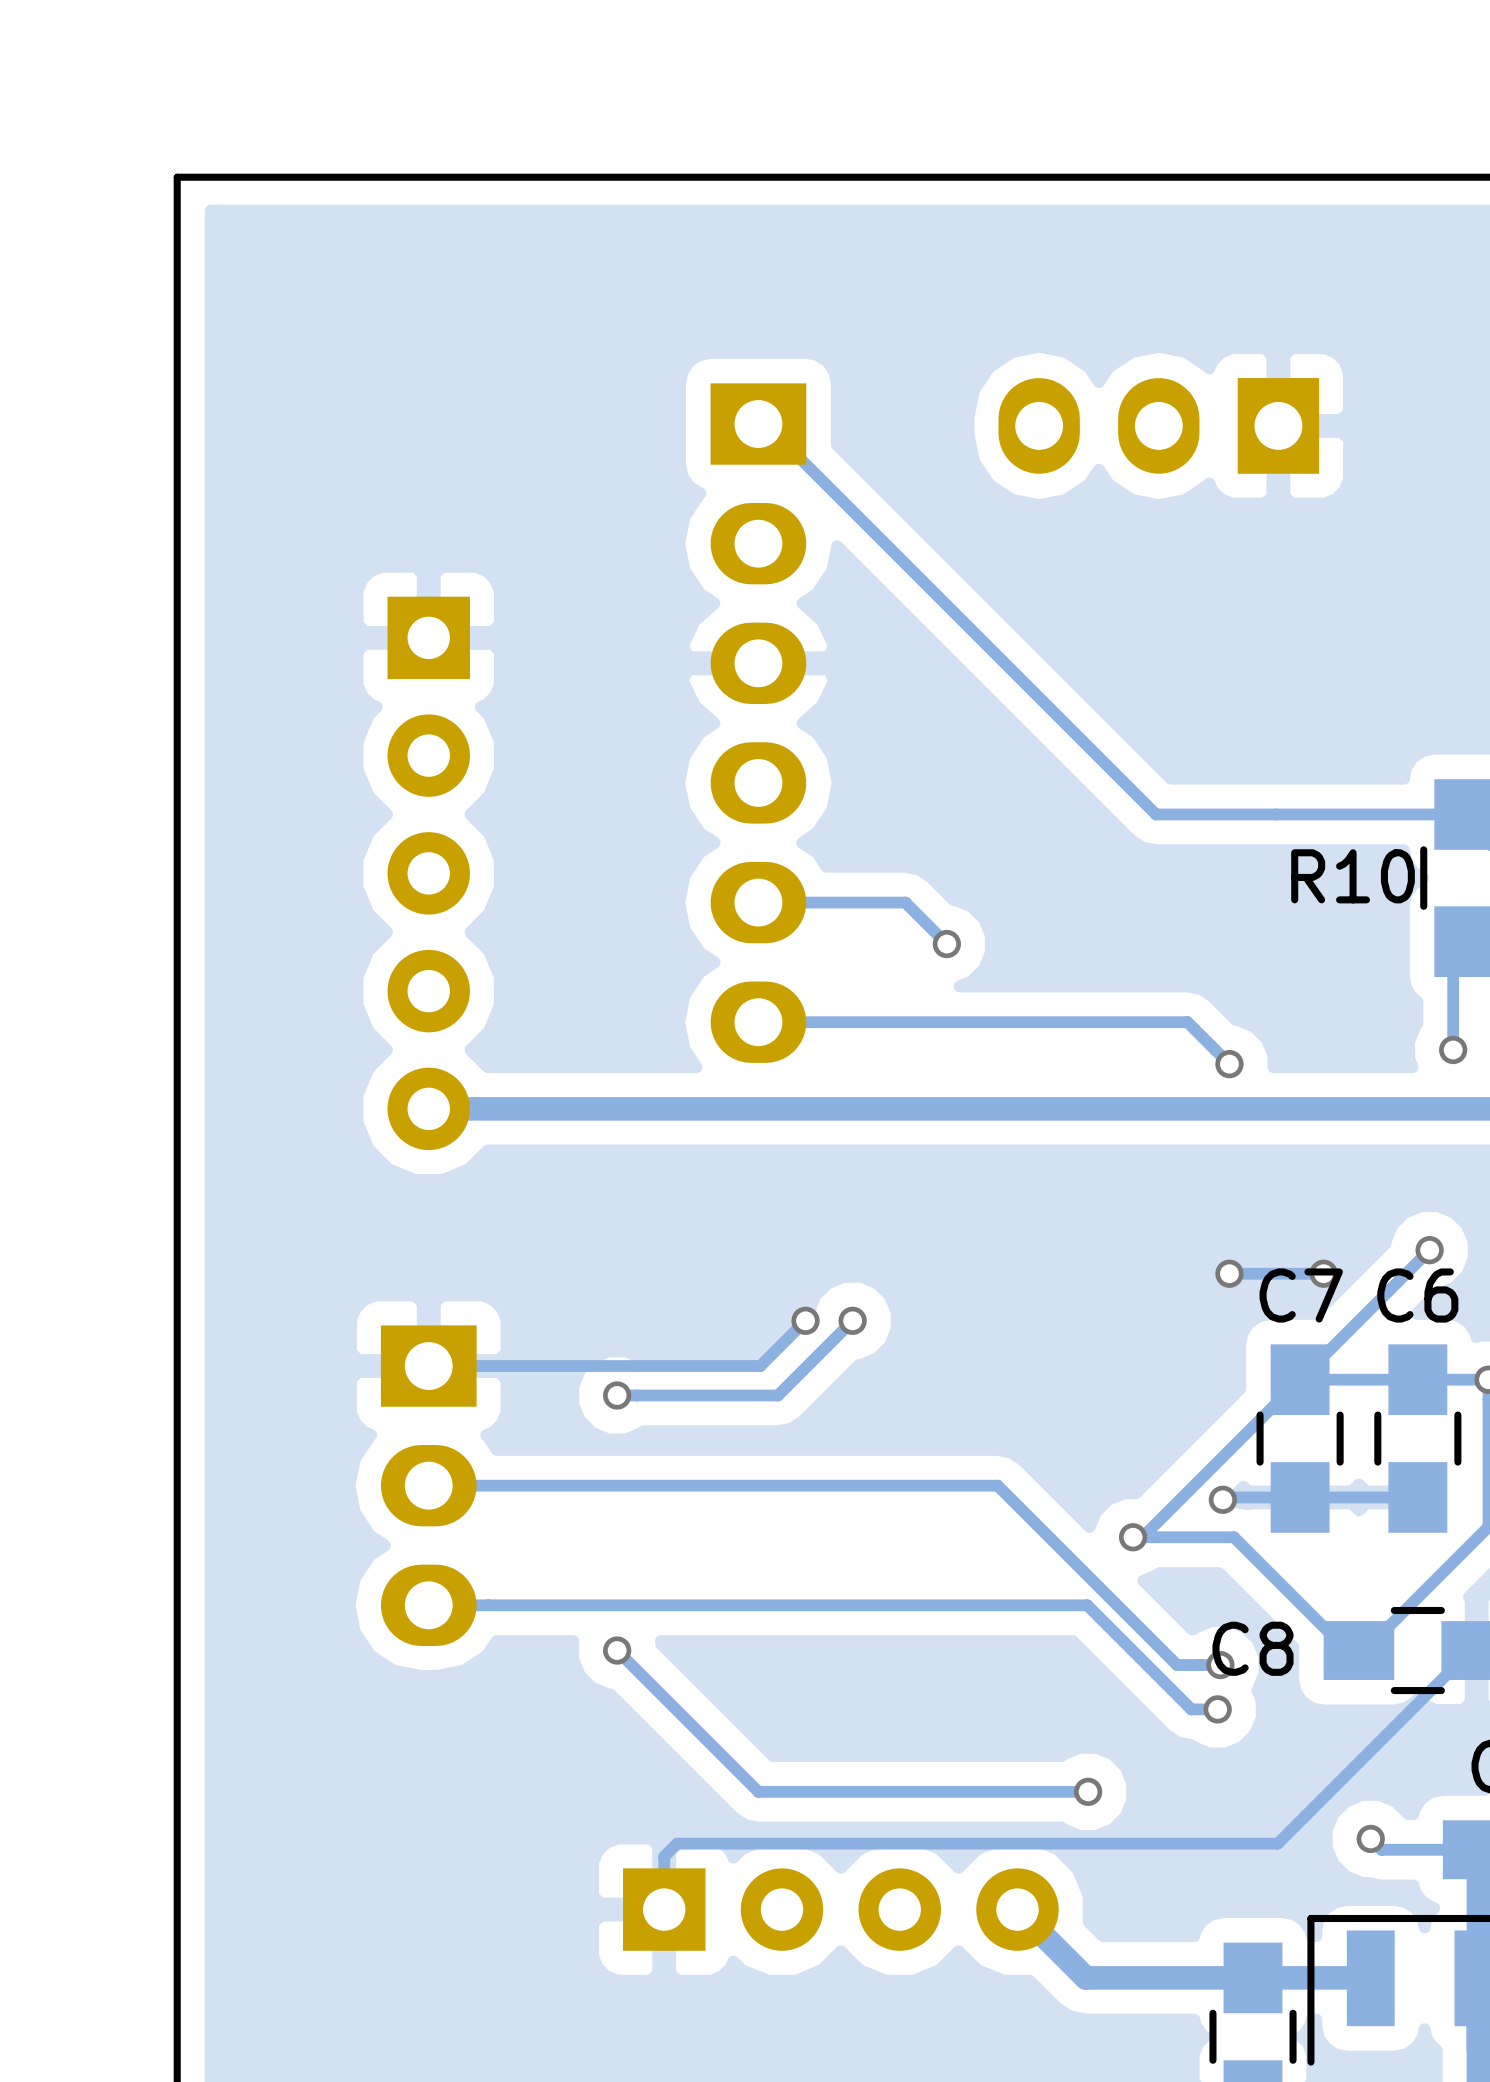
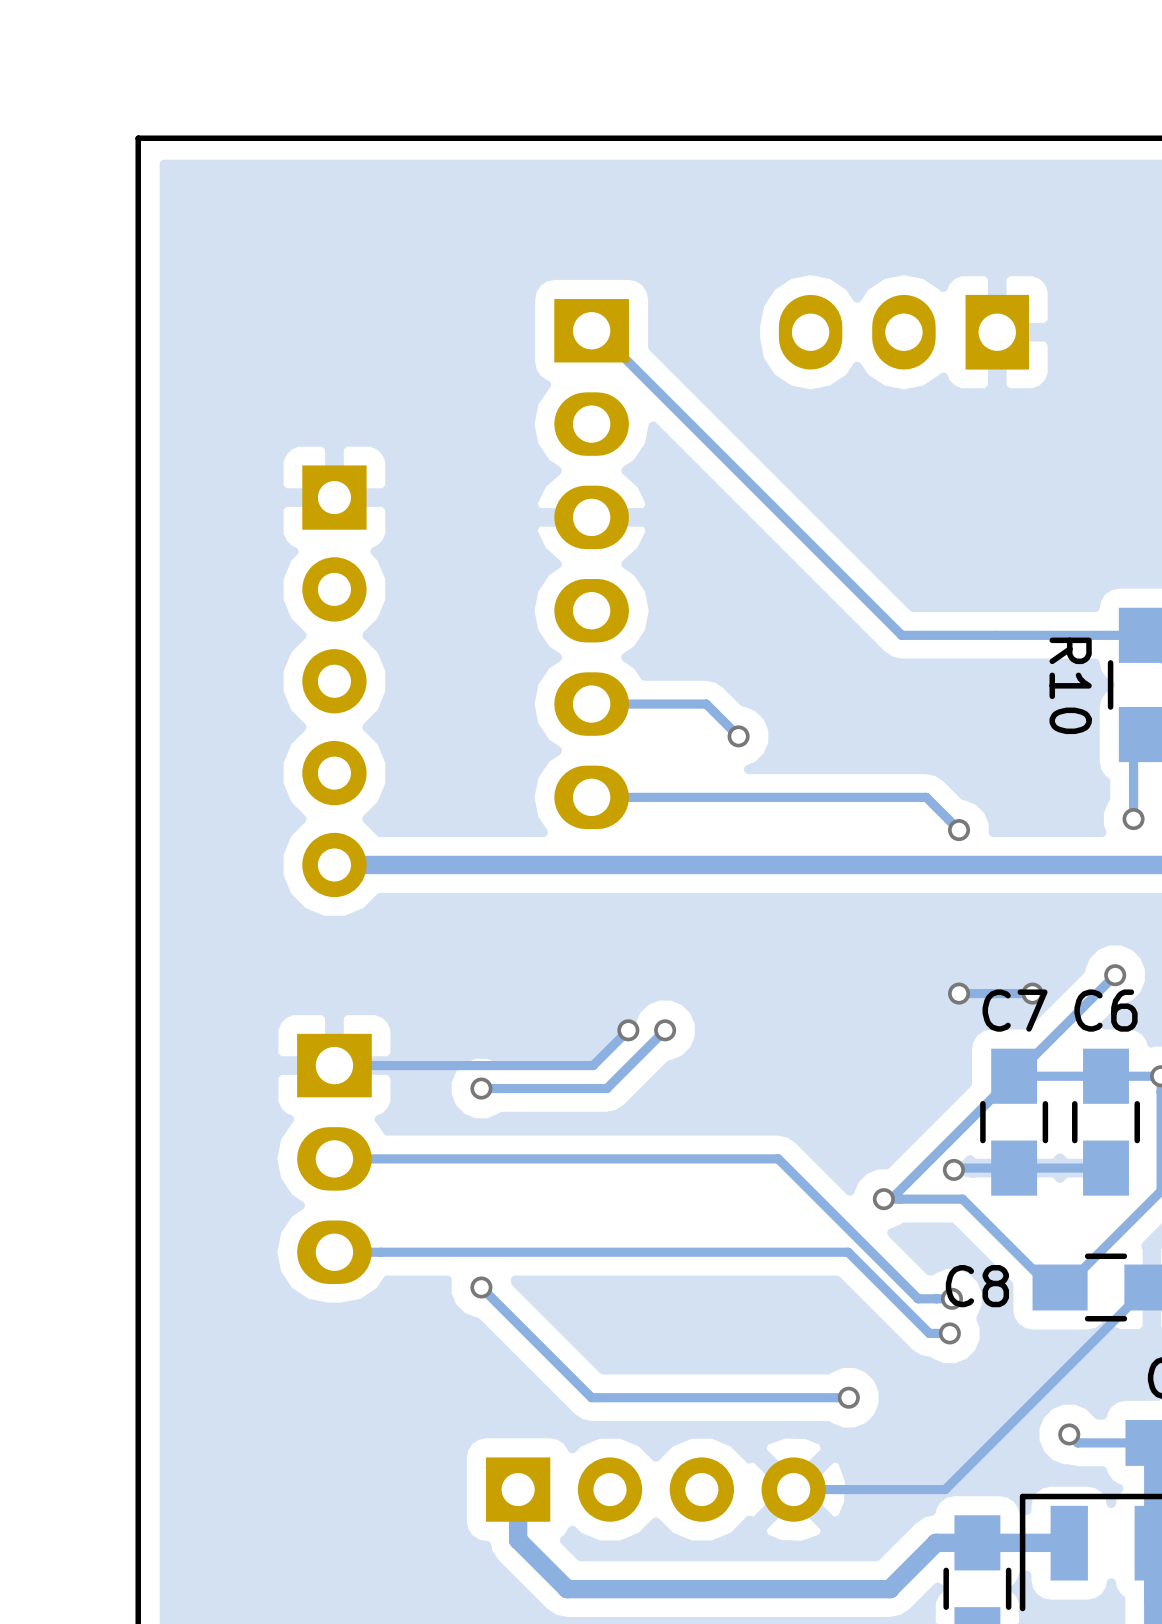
R10 name rotation: 0° (1353, 876) -> 90° clockwise (1070, 685)
track: (1277, 1843) (677, 1843) (664, 1856) (664, 1909) -> (890, 1589) (567, 1589) (518, 1540) (518, 1489)
track: (1017, 1909) (1085, 1977) (1200, 1977) -> (793, 1489) (945, 1489) (996, 1438)
track: none -> (936, 1542) (890, 1588)

